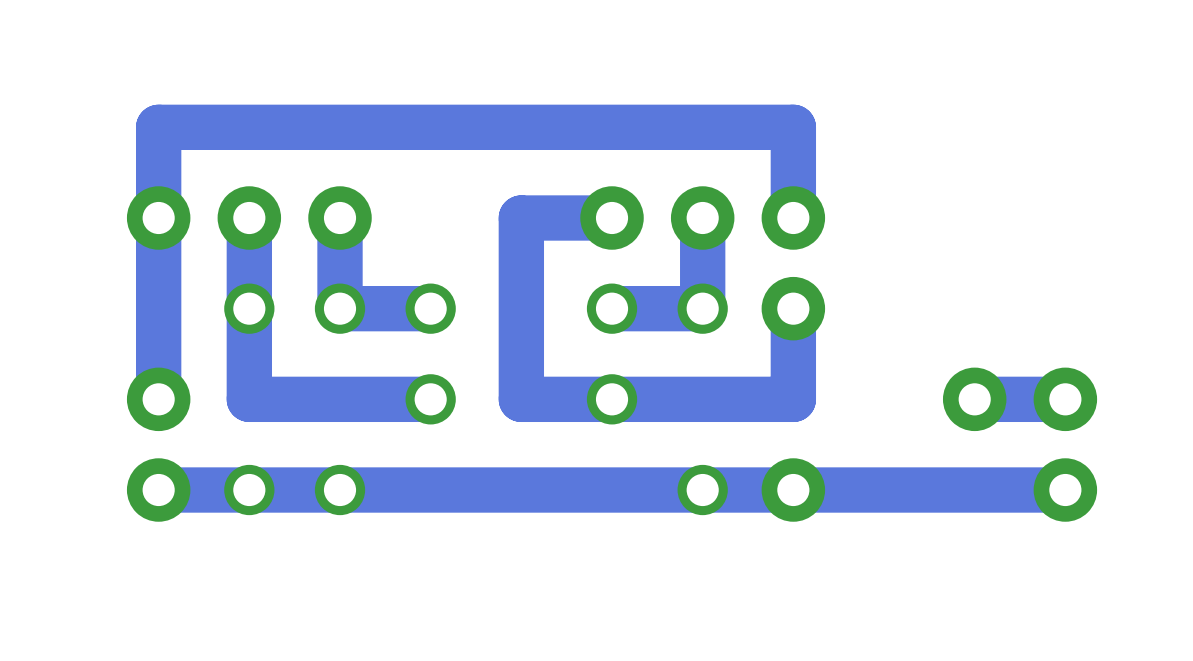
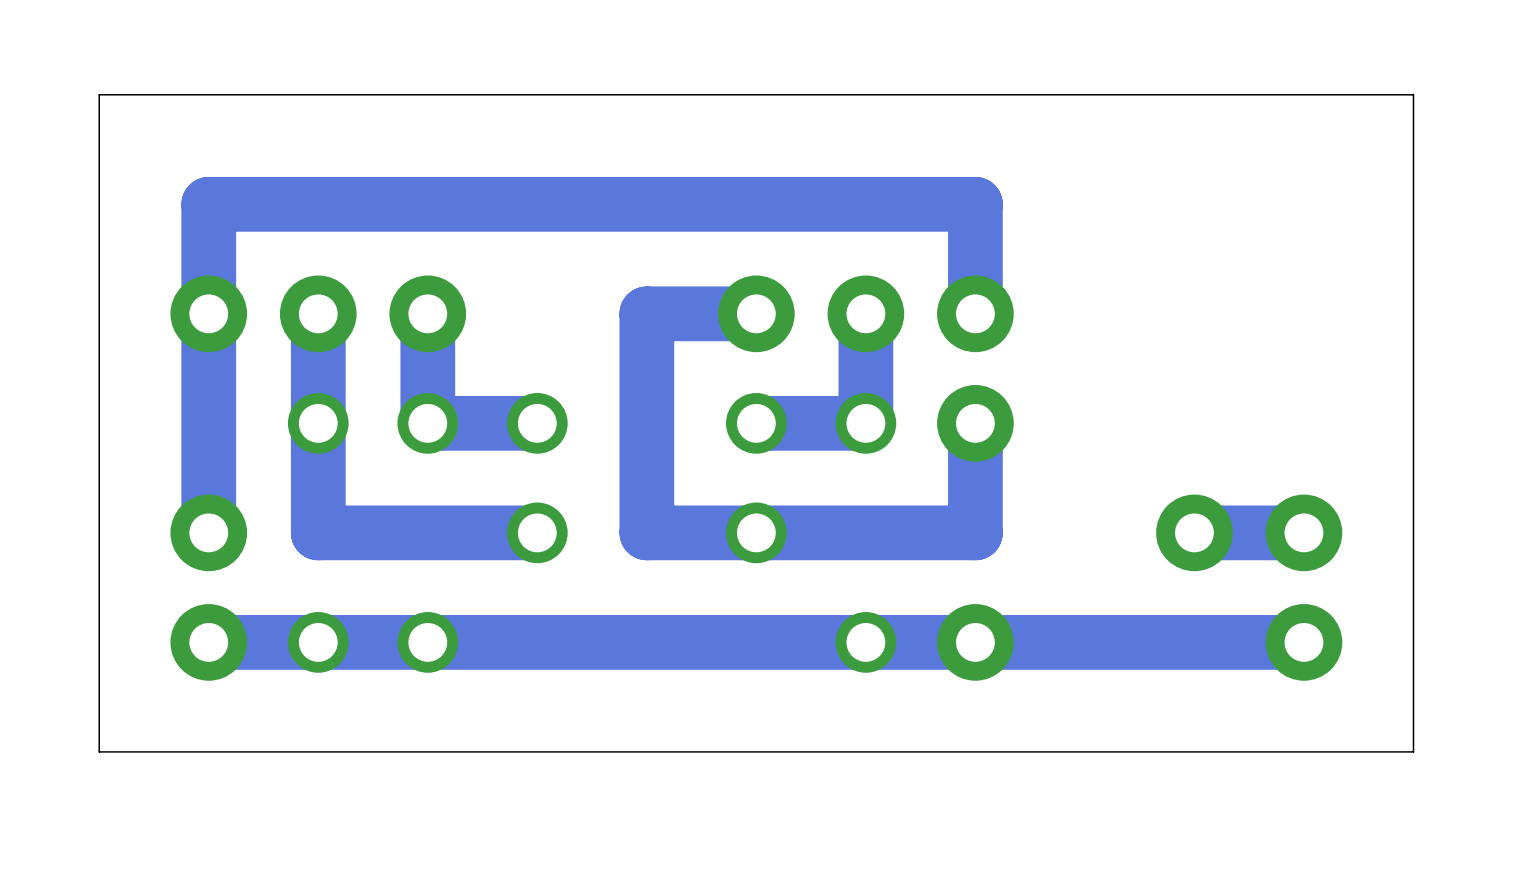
board edge: none -> (1413, 94) (1413, 751) (99, 751) (99, 94) (1413, 94)

